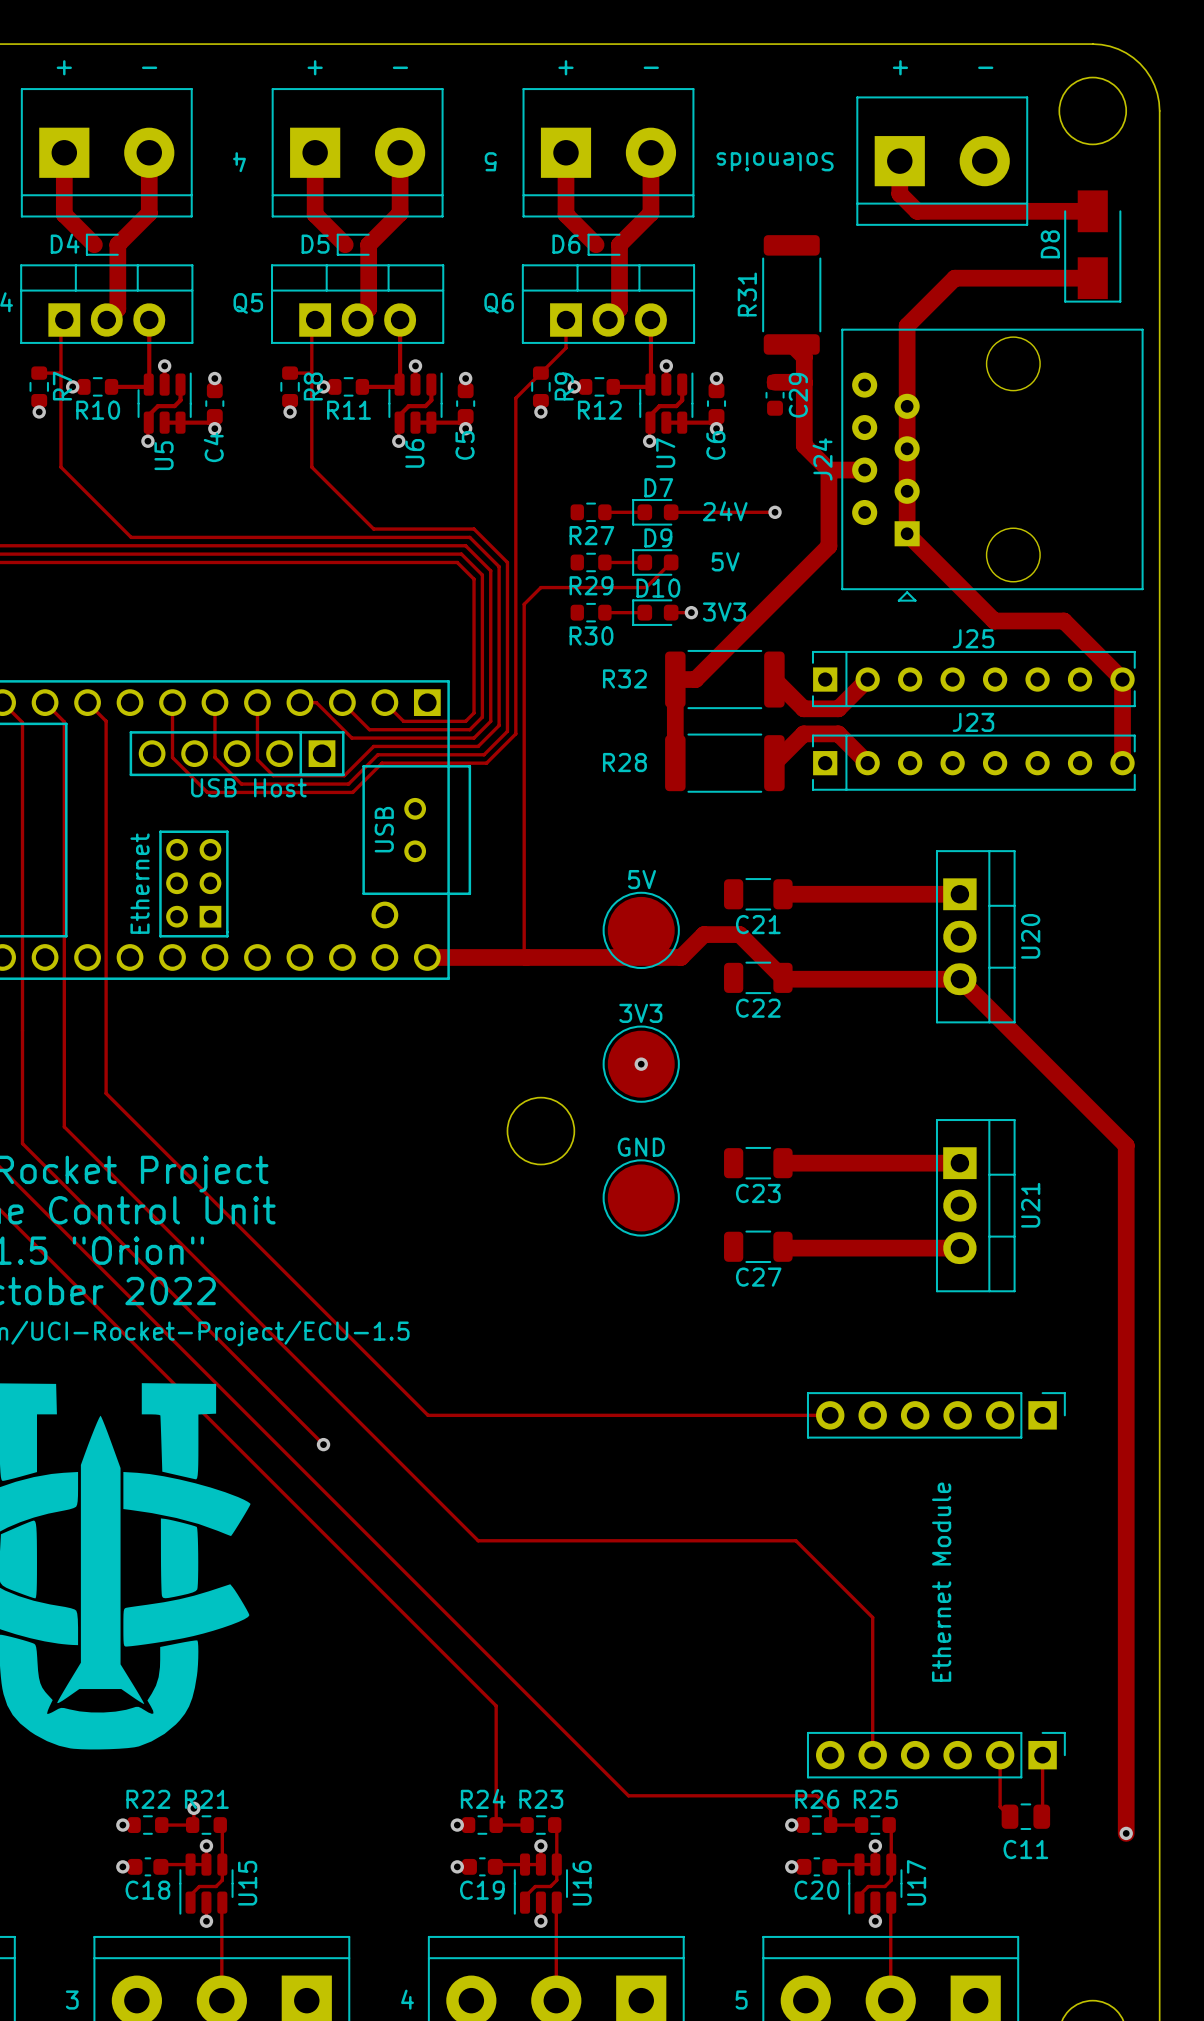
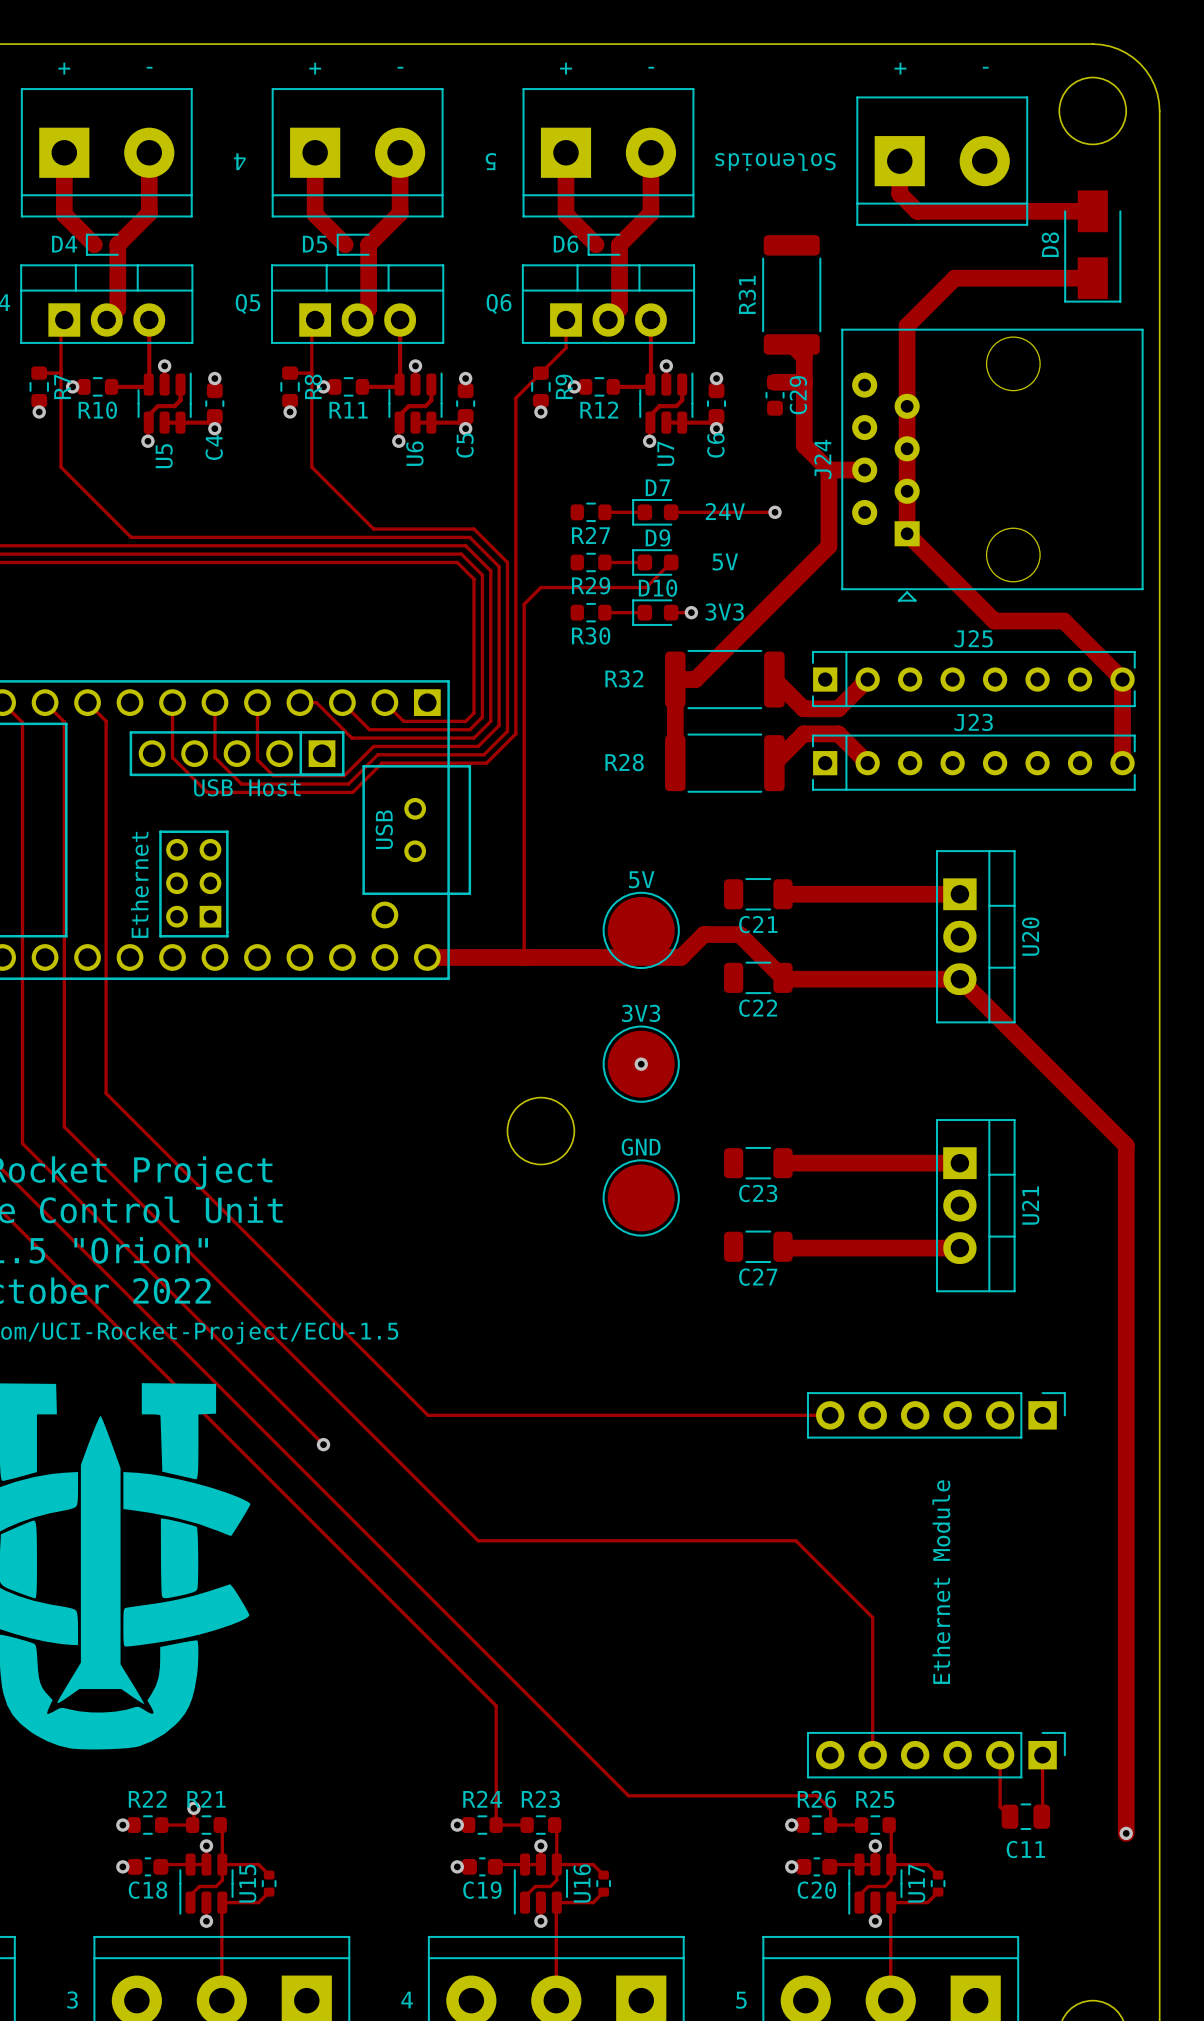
track: none -> (222, 1864) (258, 1864) (269, 1875)
track: none -> (556, 1864) (593, 1864) (603, 1875)
track: none -> (891, 1864) (927, 1864) (938, 1875)
part: none -> (269, 1883)
part: none -> (603, 1883)
part: none -> (938, 1883)
track: none -> (269, 1892) (258, 1902) (222, 1902)
track: none -> (603, 1892) (593, 1902) (556, 1902)
track: none -> (938, 1892) (927, 1902) (891, 1902)

